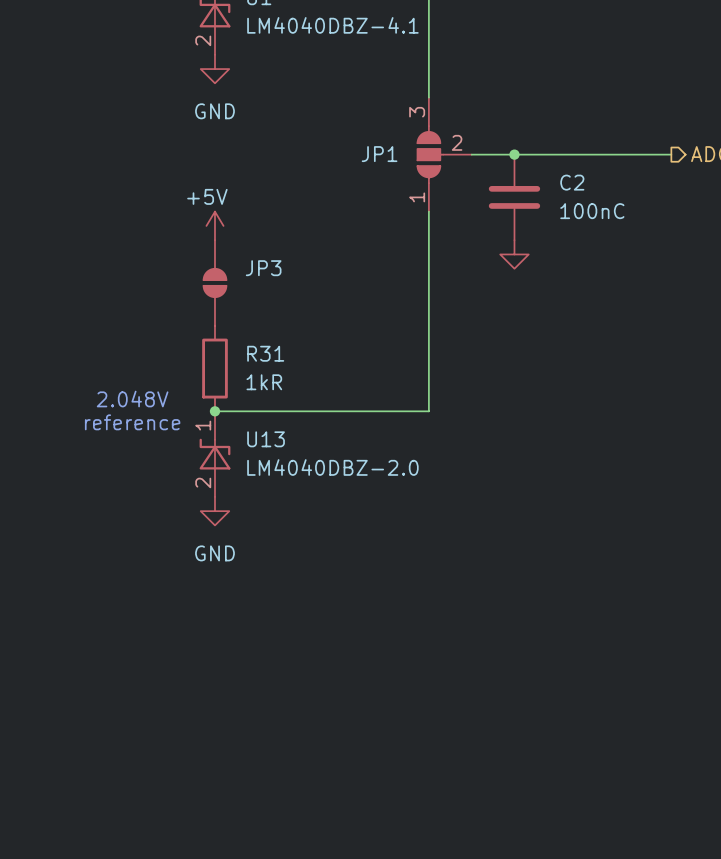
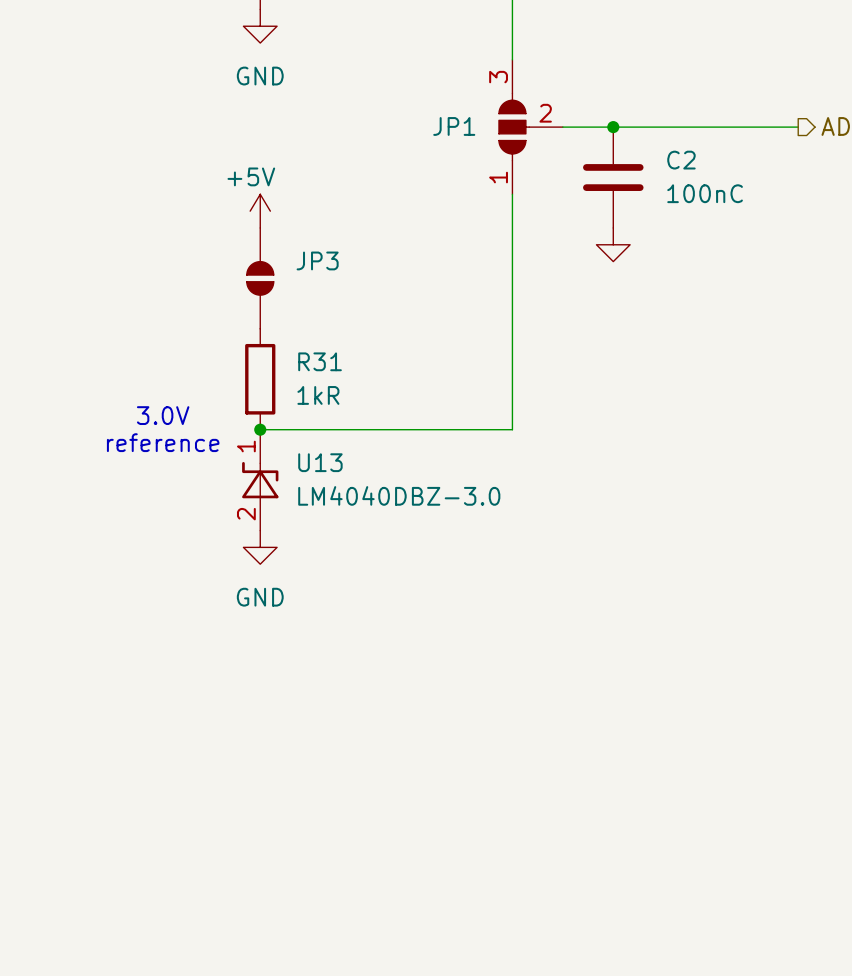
text: 2.048V (132, 399) -> 3.0V (163, 415)
U13 value: LM4040DBZ-2.0 (332, 467) -> LM4040DBZ-3.0 (399, 495)

